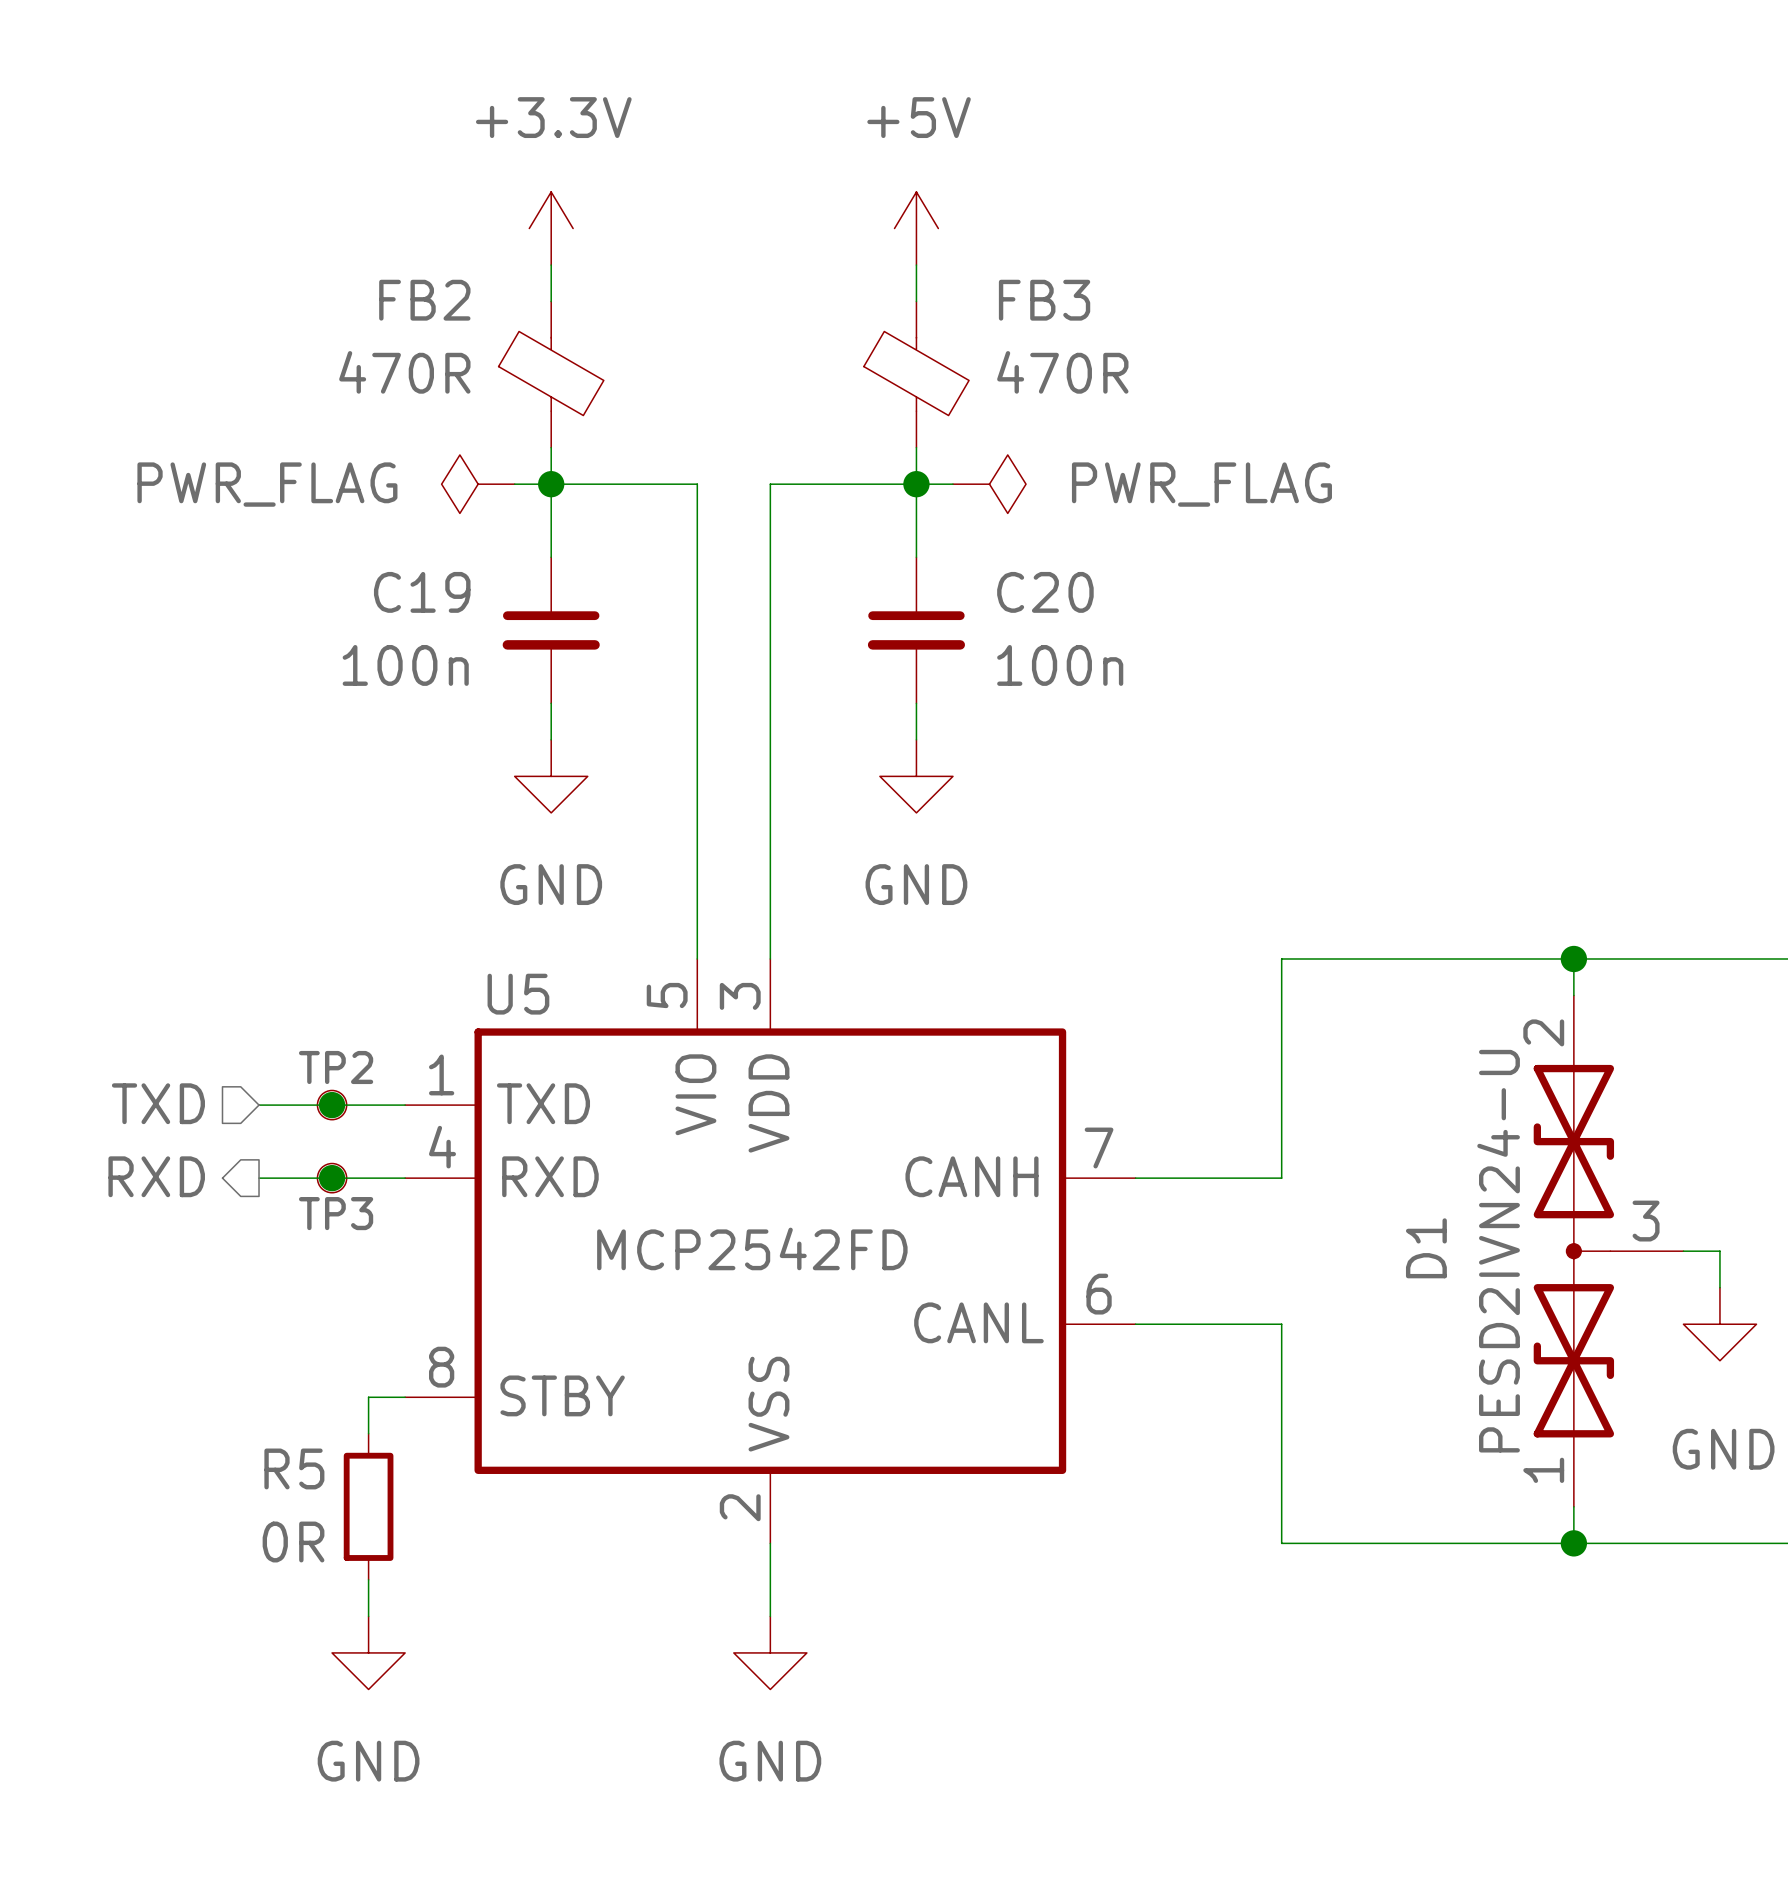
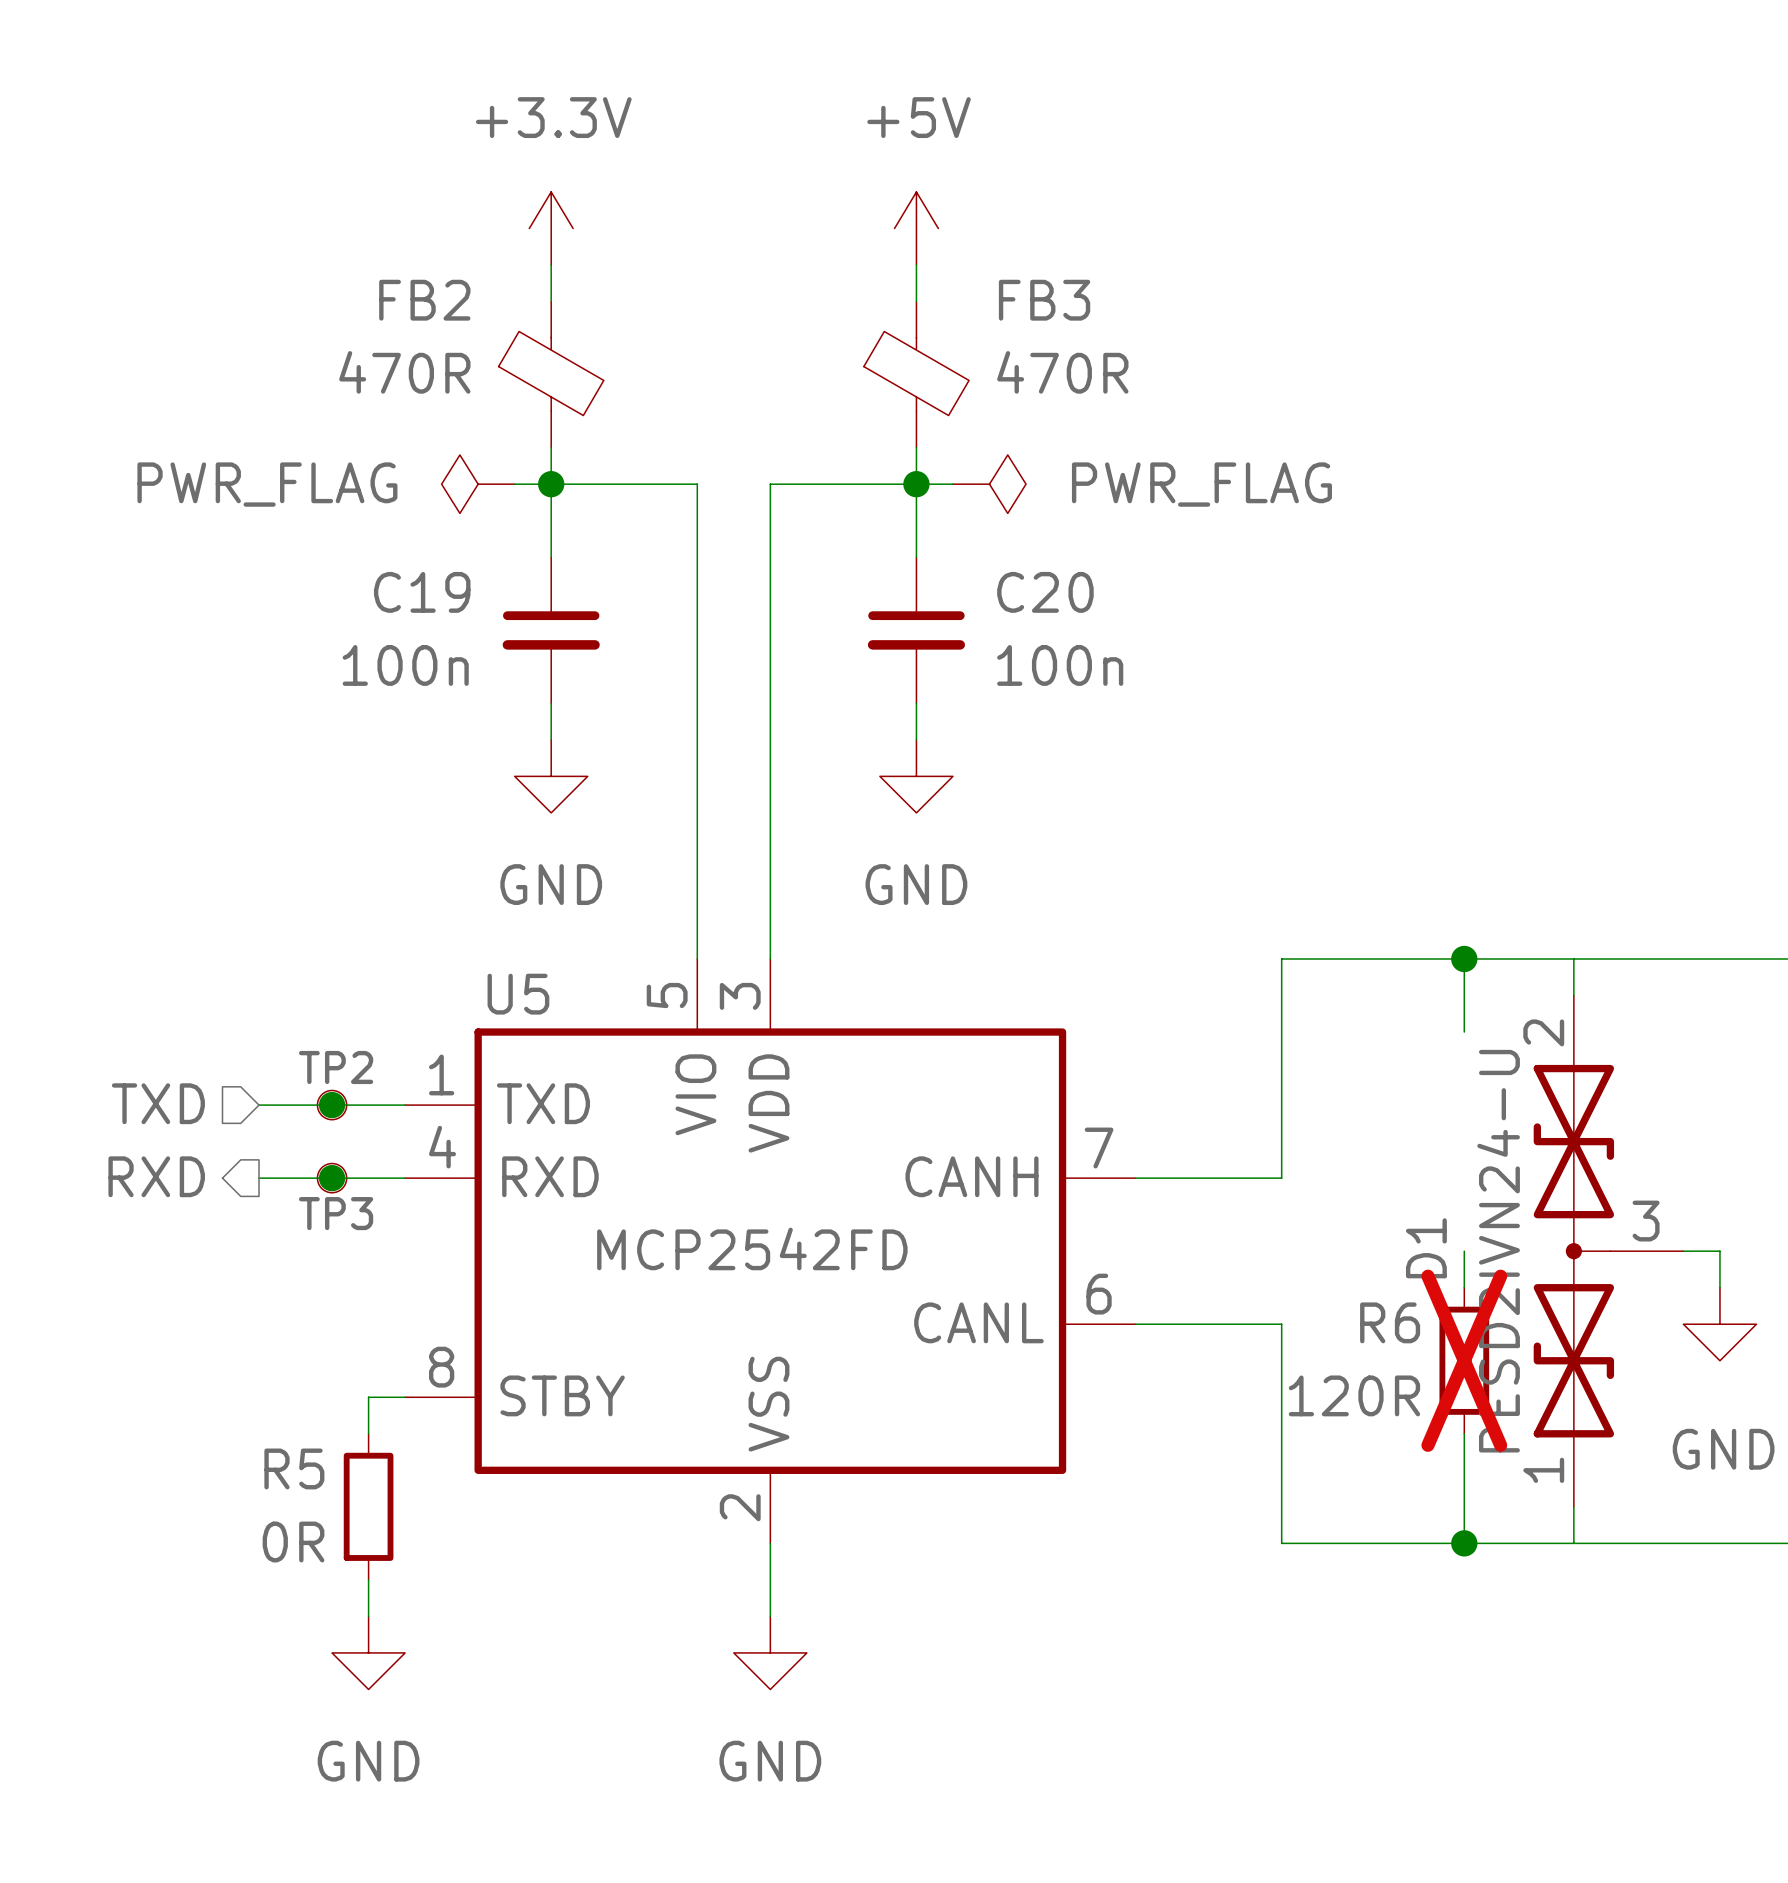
wire: none -> (1464, 958) (1464, 1032)
junction position: (1573, 958) -> (1464, 958)
wire: none -> (1464, 1251) (1464, 1287)
R6: none -> 120R (1464, 1360)
wire: none -> (1464, 1433) (1464, 1543)
junction position: (1573, 1543) -> (1464, 1543)

